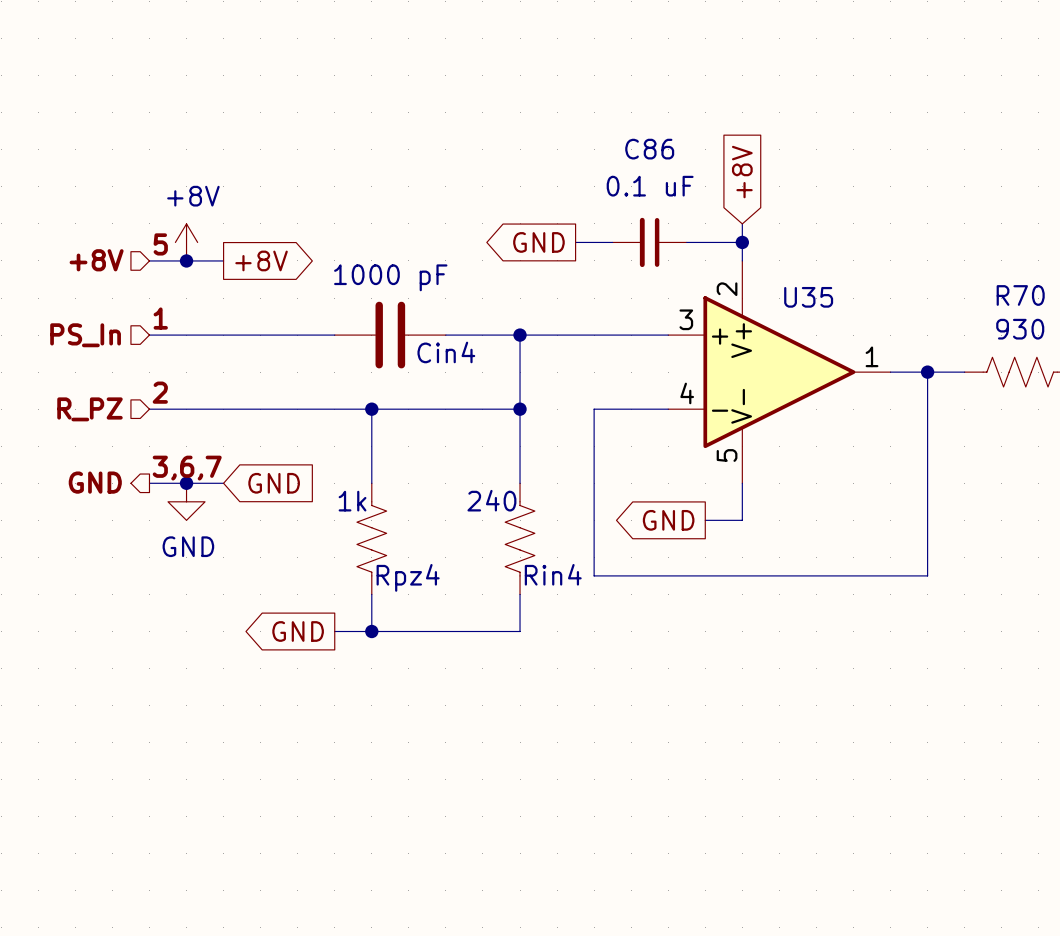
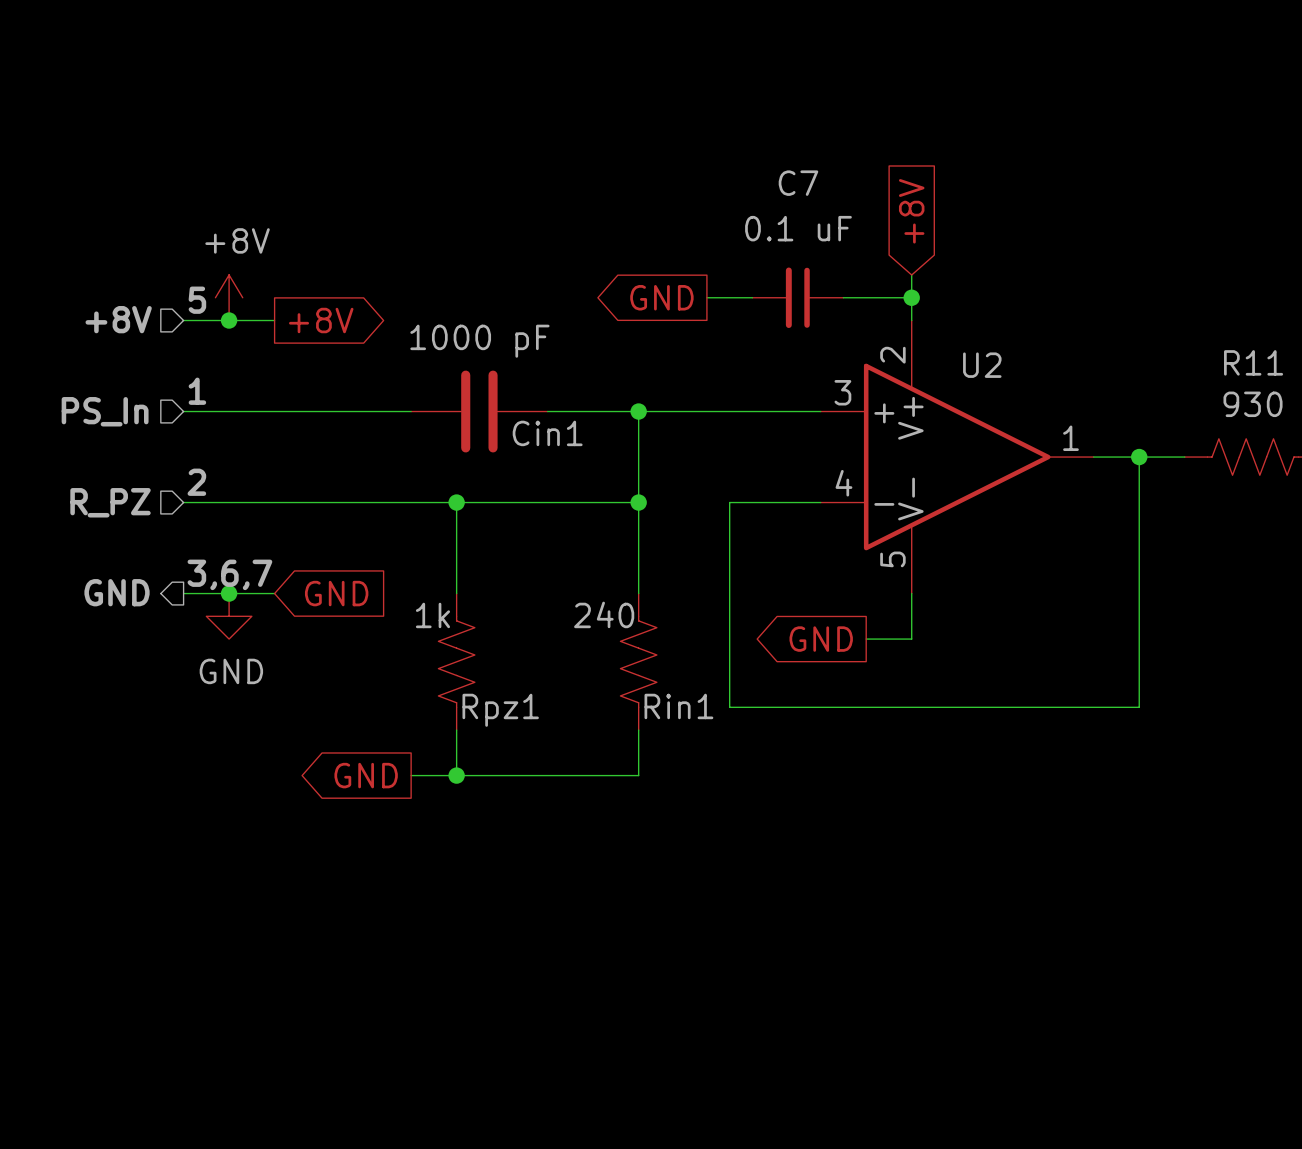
C86 name: C86 (649, 149) -> C7 (798, 183)
R70 name: R70 (1020, 295) -> R11 (1253, 362)
U35 name: U35 (808, 297) -> U2 (982, 365)
Cin4 name: Cin4 (446, 352) -> Cin1 (547, 433)
Rin4 name: Rin4 (553, 574) -> Rin1 (678, 706)
Rpz4 name: Rpz4 (408, 577) -> Rpz1 (500, 710)

